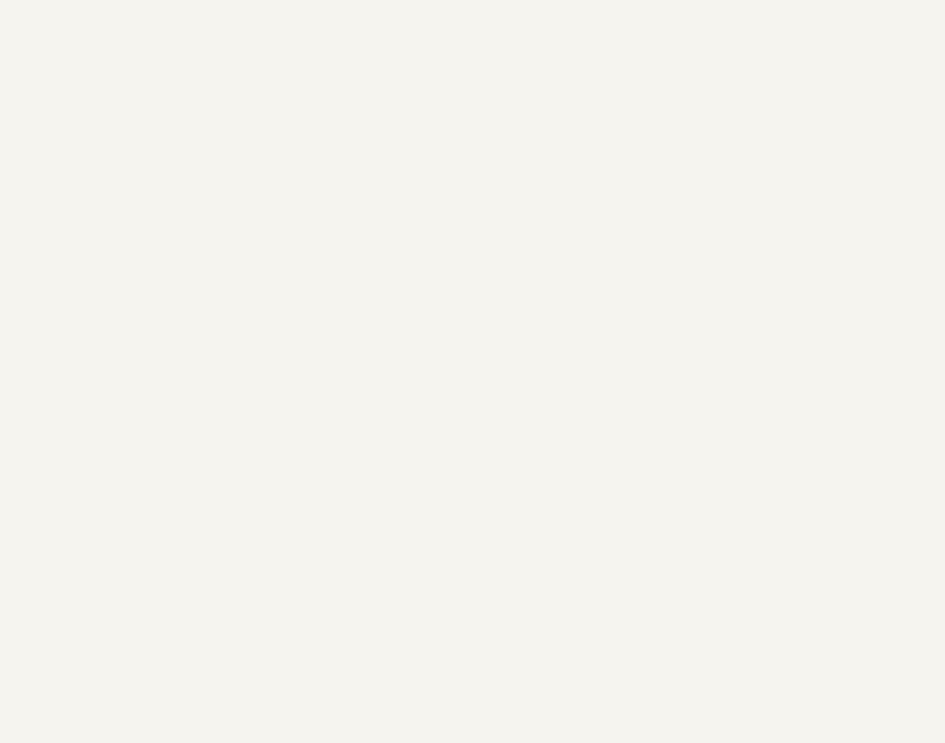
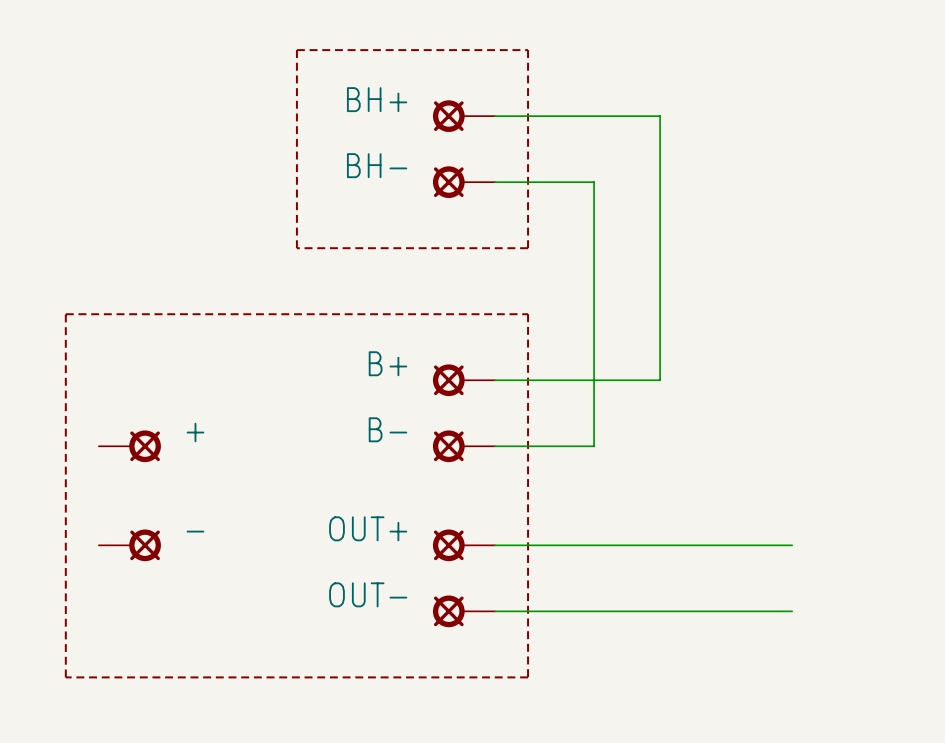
line: none -> (296, 50) (296, 248) (528, 248) (528, 50) (296, 50)
BH+: none -> (463, 116)
wire: none -> (495, 116) (660, 116) (660, 380) (495, 380)
BH-: none -> (463, 182)
wire: none -> (495, 182) (594, 182) (594, 446) (495, 446)
line: none -> (65, 314) (65, 677) (528, 677) (528, 314) (65, 314)
B+: none -> (463, 380)
part: none -> (129, 446)
B-: none -> (463, 446)
part: none -> (129, 545)
OUT+: none -> (463, 545)
wire: none -> (495, 545) (792, 545)
OUT-: none -> (463, 611)
wire: none -> (495, 611) (792, 611)

